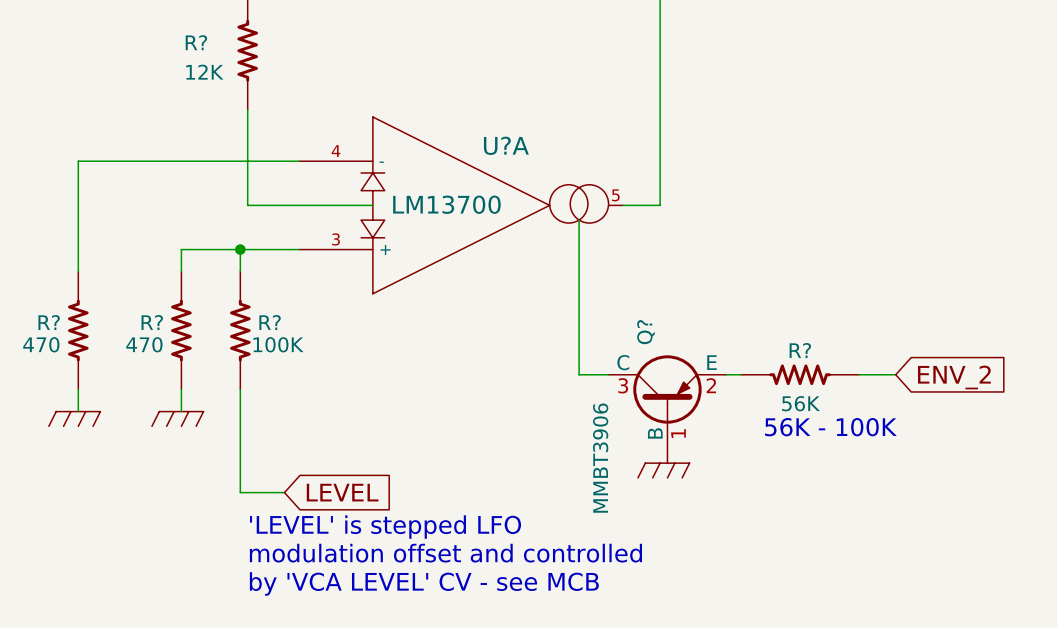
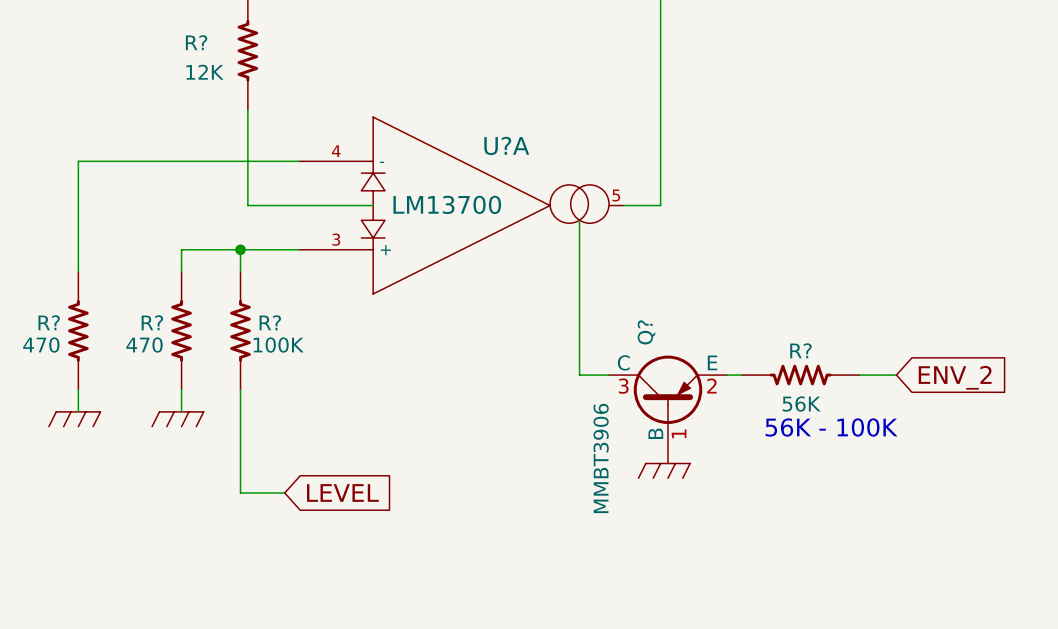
text: 'LEVEL' is stepped LFO (385, 527) -> none
text: modulation offset and controlled (445, 553) -> none
text: by 'VCA LEVEL' CV - see MCB (424, 583) -> none

